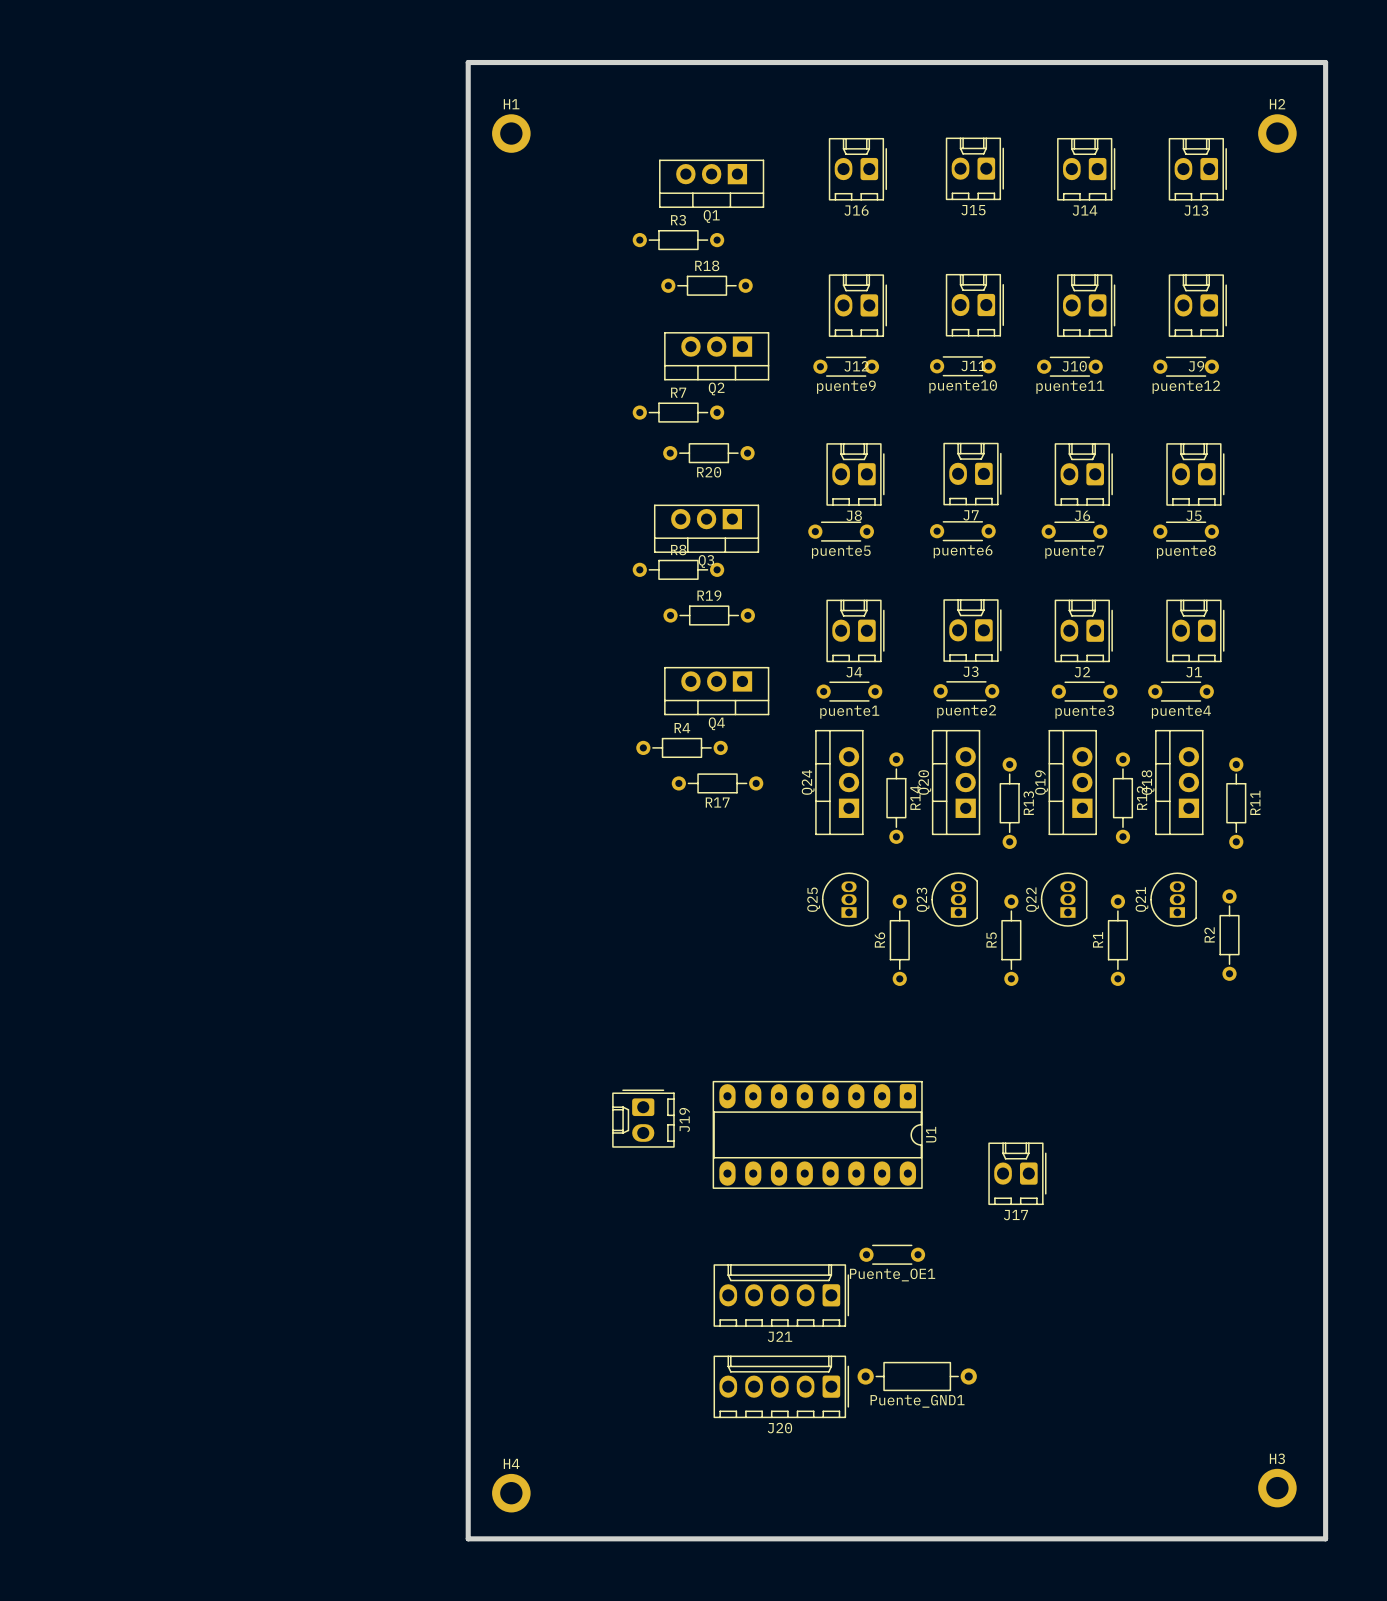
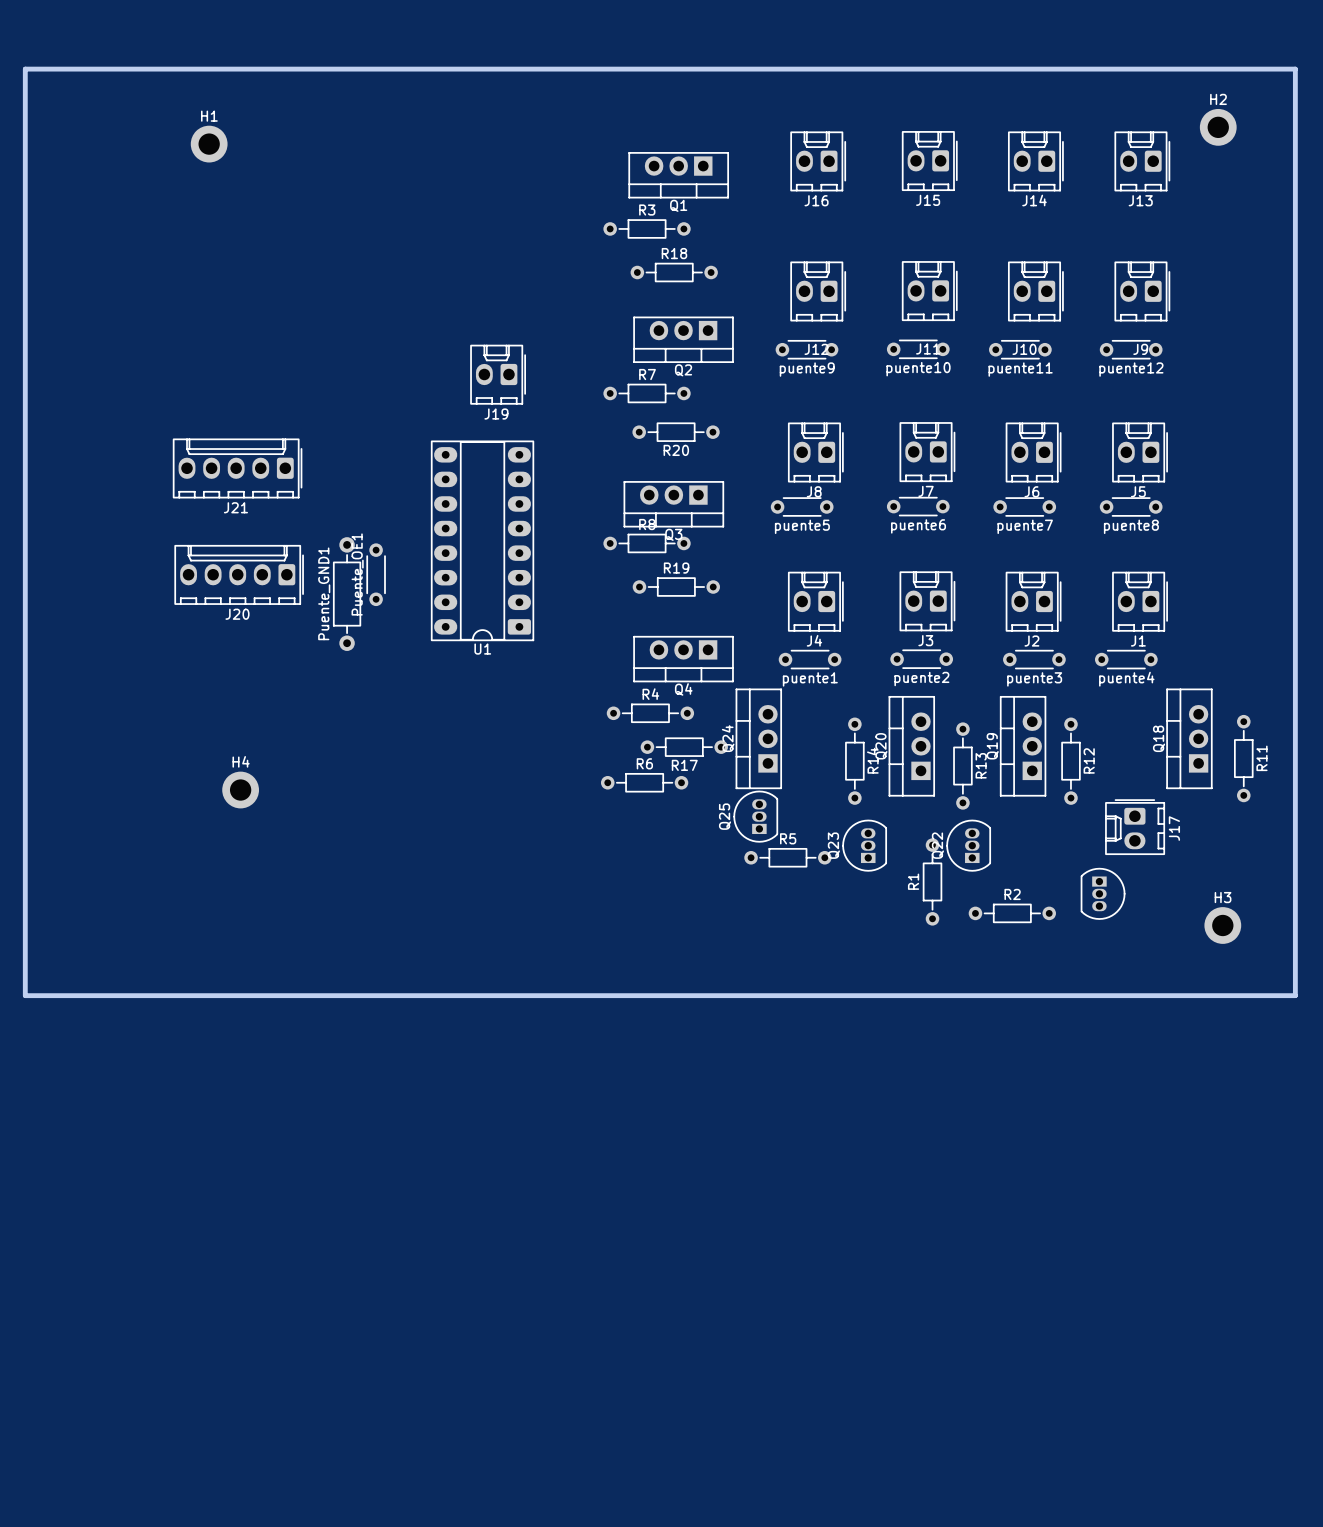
board edge: (468, 62) (1325, 62) (1325, 1538) (468, 1538) (468, 62) -> none
board edge: none -> (25, 69) (1295, 69) (1295, 995) (25, 995) (25, 69)
H1 position: (511, 133) -> (209, 144)
Q24 position: (839, 782) -> (758, 738)
Q18 position: (1179, 782) -> (1189, 738)
R11 position: (1236, 803) -> (1243, 758)
Q25 position: (845, 899) -> (755, 816)
Q23 position: (954, 899) -> (864, 845)
Q22 position: (1064, 899) -> (968, 845)
Q21: (1173, 899) -> none
R2 rotation: 0° (1229, 935) -> 90° clockwise (1012, 913)
R2 position: (1229, 935) -> (1012, 913)
part: none -> (1103, 893)
R6 rotation: 0° (899, 940) -> 90° clockwise (644, 782)
R6 position: (899, 940) -> (644, 782)
R5 rotation: 0° (1011, 940) -> 90° clockwise (787, 857)
R5 position: (1011, 940) -> (787, 857)
R1 position: (1117, 940) -> (932, 881)
J19 rotation: 0° (643, 1118) -> 90° clockwise (498, 374)
J19 position: (643, 1118) -> (498, 374)
U1 rotation: 0° (817, 1134) -> 90° clockwise (482, 540)
U1 position: (817, 1134) -> (482, 540)
J17 rotation: 0° (1017, 1173) -> 90° counterclockwise (1135, 827)
J17 position: (1017, 1173) -> (1135, 827)
Puente_OE1 rotation: 0° (892, 1254) -> 90° clockwise (376, 574)
Puente_OE1 position: (892, 1254) -> (376, 574)
J21 position: (781, 1295) -> (237, 468)
Puente_GND1 rotation: 0° (917, 1376) -> 90° clockwise (347, 594)
Puente_GND1 position: (917, 1376) -> (347, 594)
J20 position: (781, 1386) -> (239, 574)
H3 position: (1277, 1488) -> (1222, 925)
H4 position: (511, 1493) -> (240, 790)

